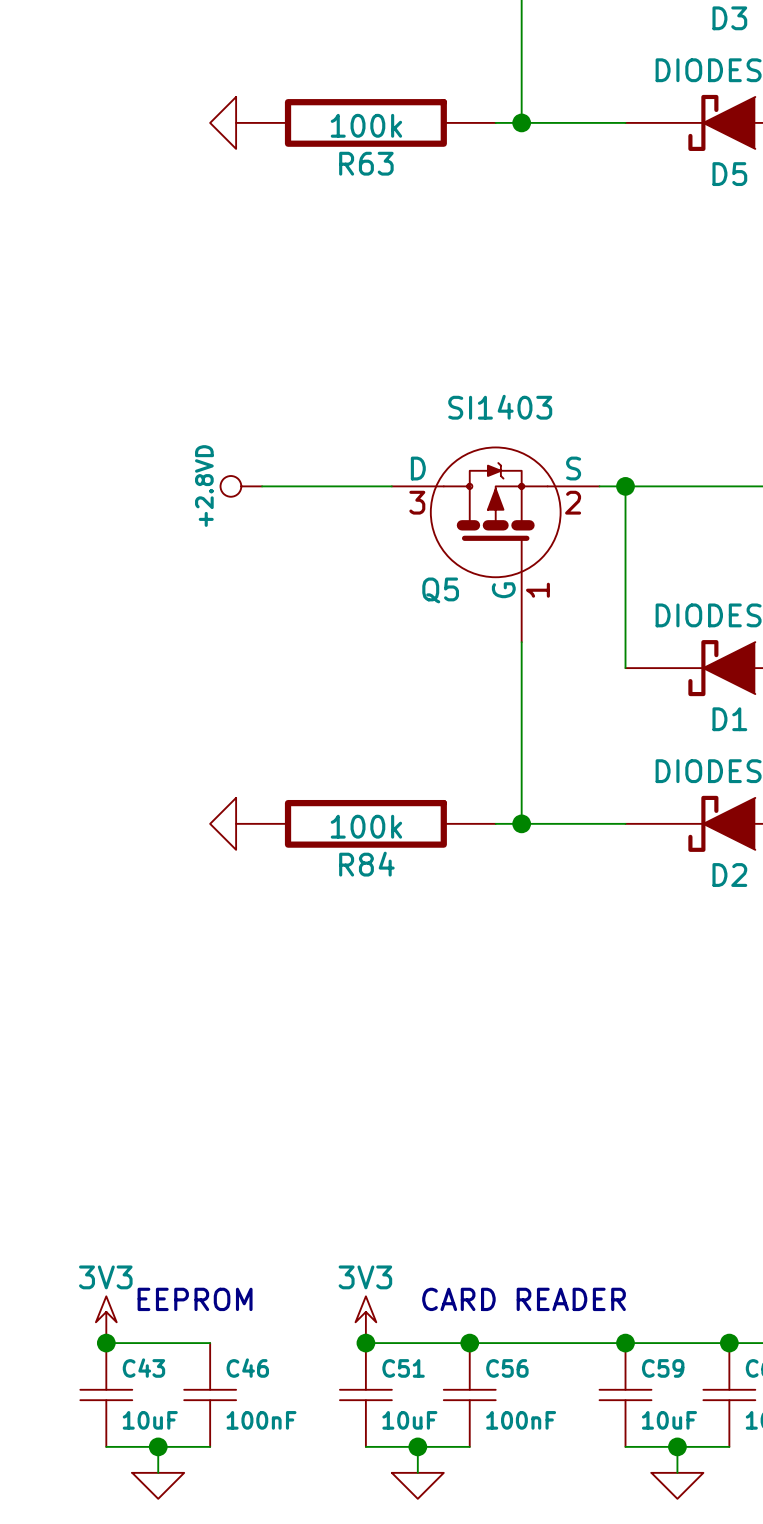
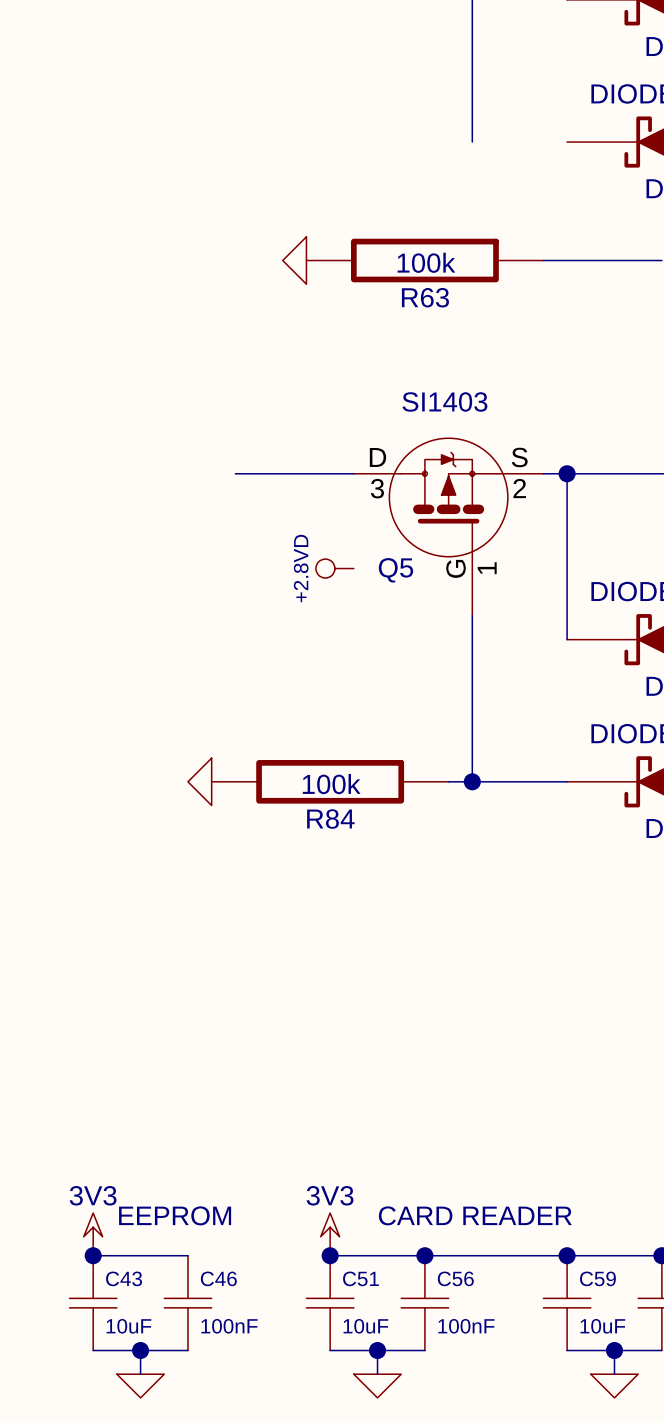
power symbol position: (223, 122) -> (294, 260)
R63 position: (365, 122) -> (424, 260)
wire: (495, 122) (625, 122) -> (543, 260) (661, 260)
junction: (521, 122) -> none
power symbol position: +2.8VD (241, 486) -> +2.8VD (334, 568)

